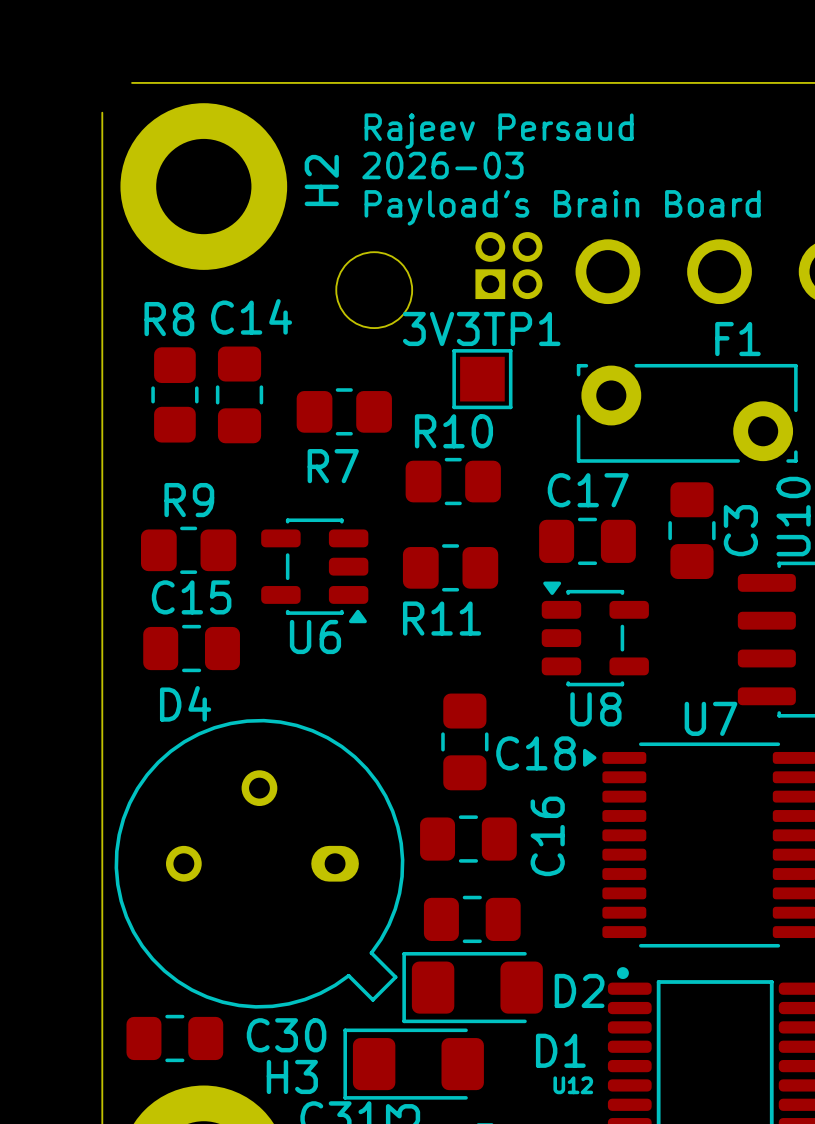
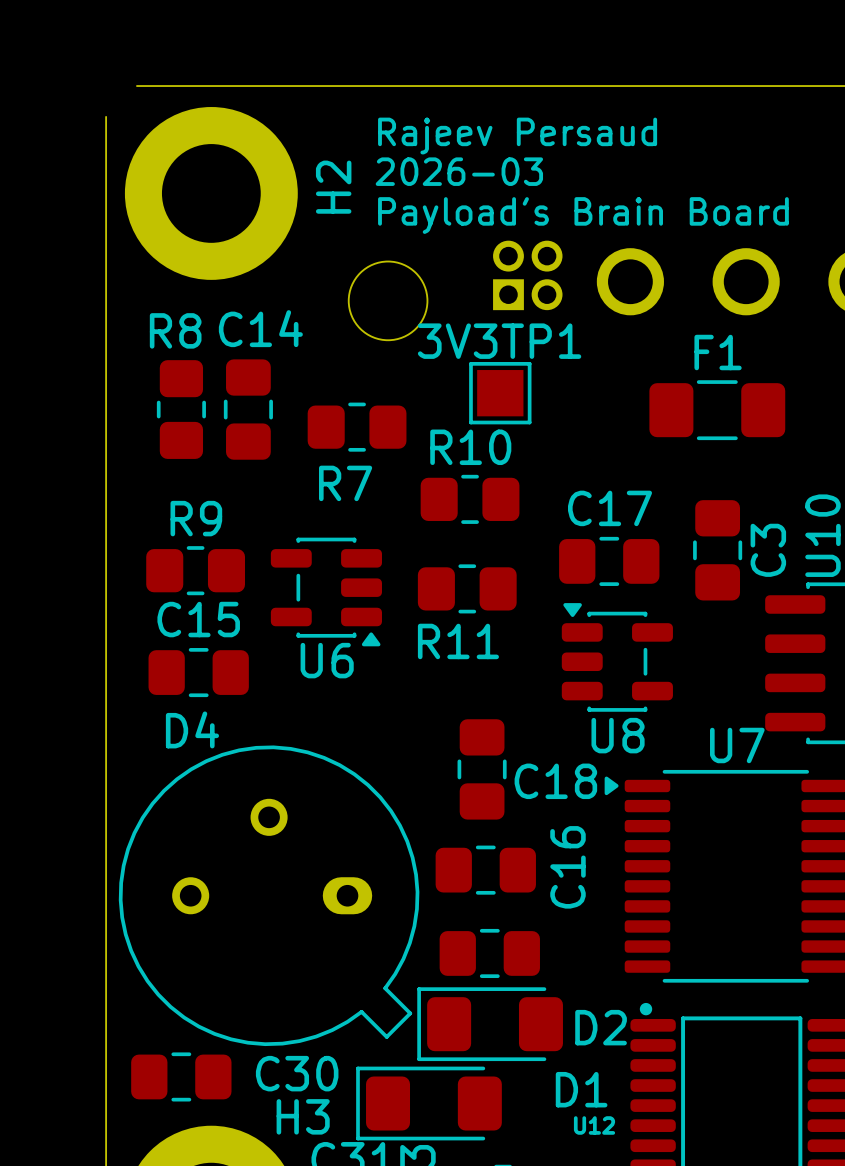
F1 footprint: [576, 363, 798, 463] -> [649, 380, 786, 441]

